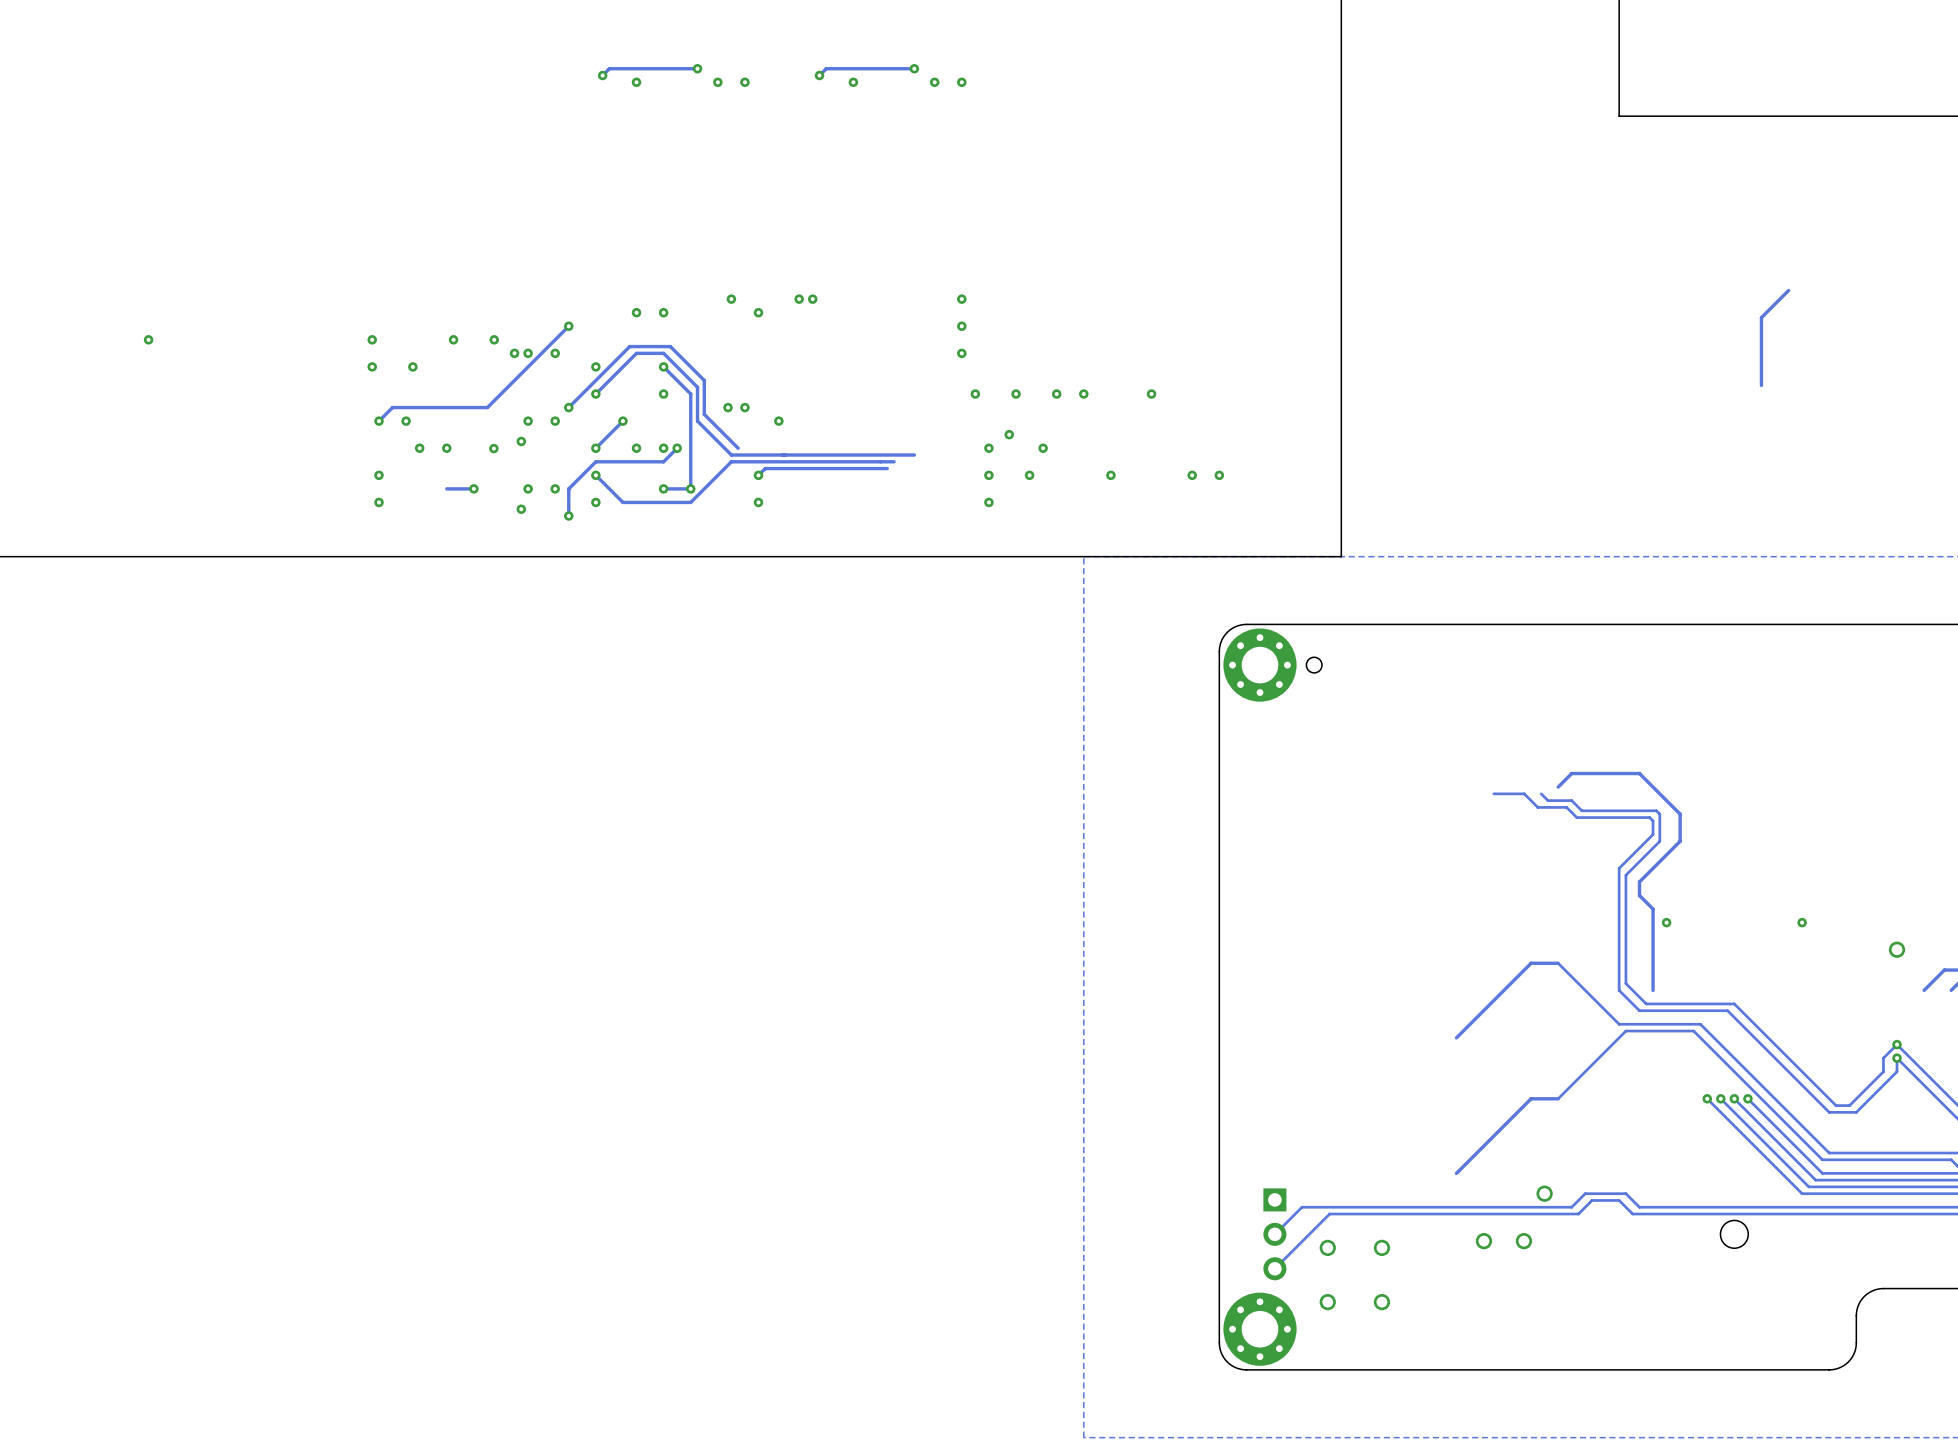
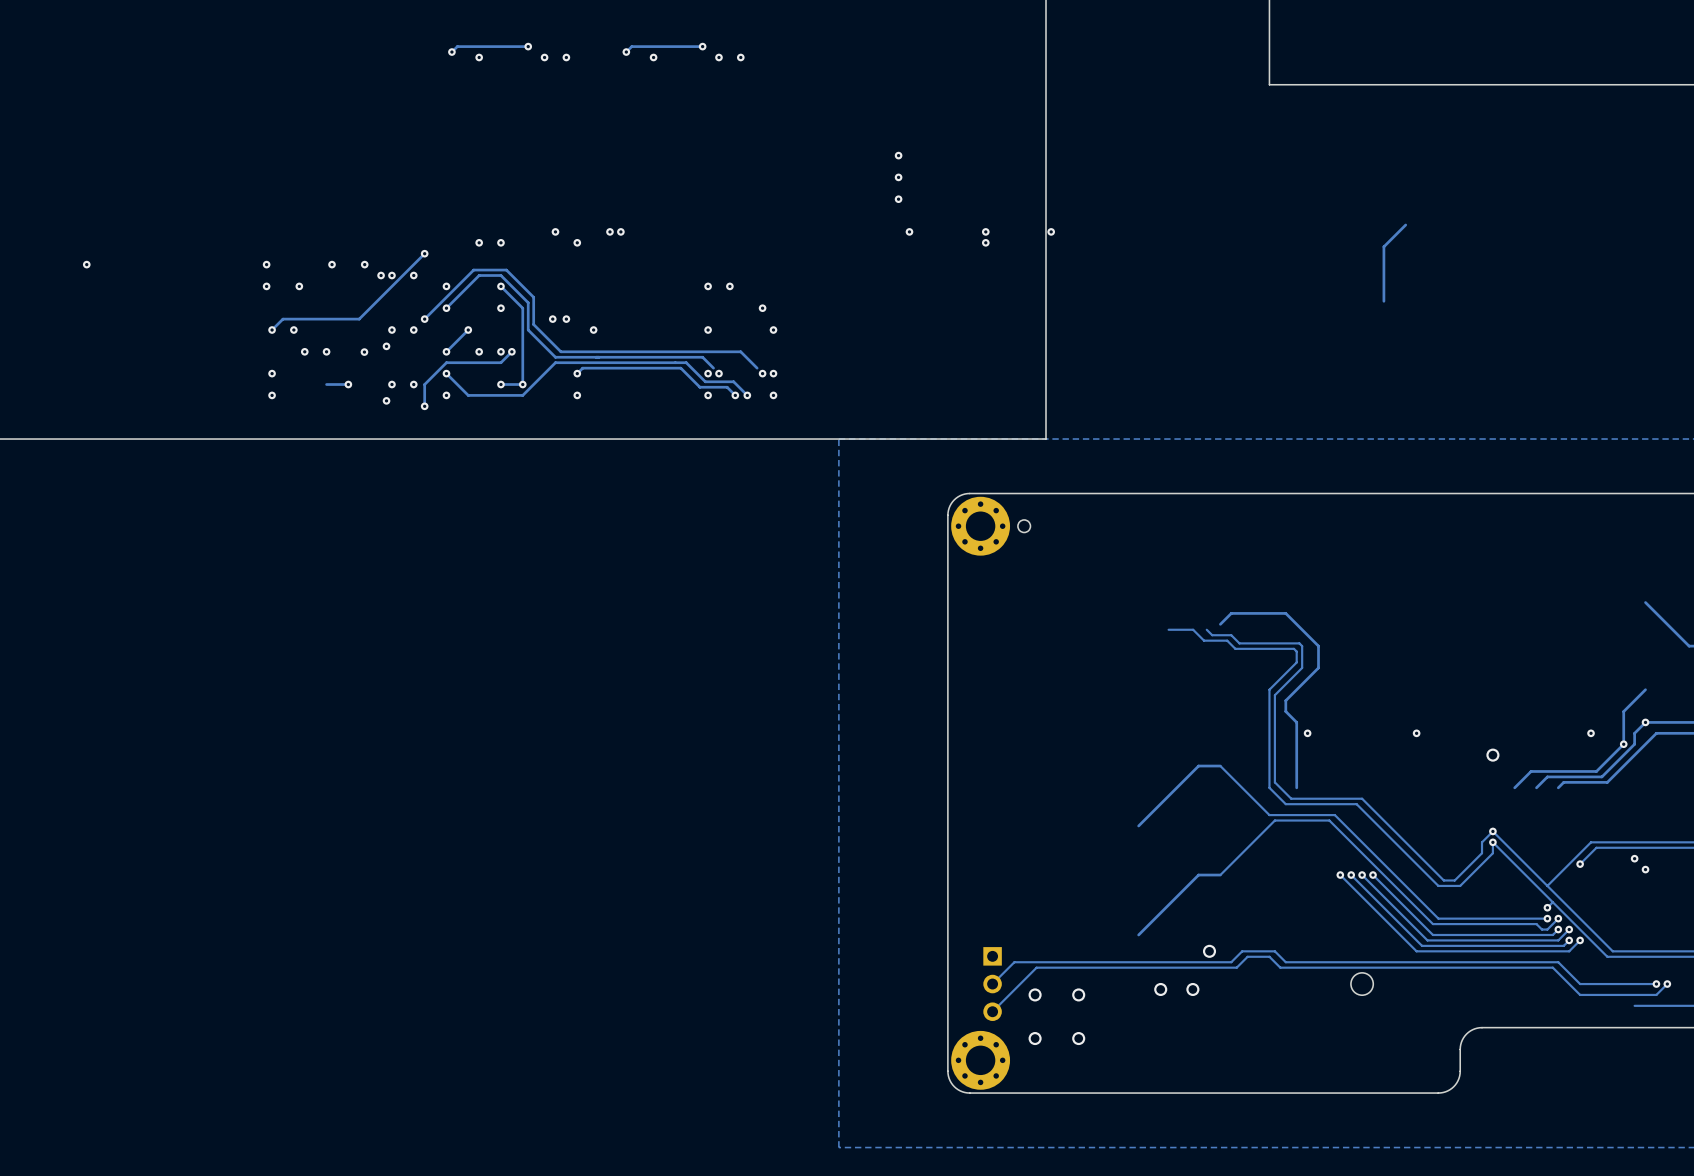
via: none -> (898, 155)
via: none -> (898, 177)
via: none -> (898, 199)
via: (961, 299) -> none
via: none -> (909, 231)
via: none -> (985, 231)
via: none -> (1051, 231)
via: none -> (985, 242)
via: (961, 326) -> none
via: (961, 353) -> none
via: none -> (708, 286)
via: none -> (729, 286)
via: (975, 394) -> none
via: none -> (762, 308)
via: (1016, 394) -> none
via: (1056, 394) -> none
via: (1083, 394) -> none
via: (1151, 394) -> none
via: none -> (708, 330)
via: none -> (773, 330)
via: (1009, 434) -> none
track: none -> (560, 351) (740, 351) (757, 368)
via: (988, 448) -> none
via: (1043, 448) -> none
track: none -> (702, 357) (713, 368)
track: none -> (686, 362) (705, 381) (733, 381) (747, 395)
track: none -> (680, 368) (699, 387) (727, 387) (735, 395)
via: none -> (708, 373)
via: none -> (718, 373)
via: none -> (773, 373)
via: (1029, 475) -> none
via: (1110, 475) -> none
via: (1192, 475) -> none
via: (1219, 475) -> none
via: none -> (708, 395)
via: none -> (735, 395)
via: none -> (747, 395)
via: (988, 502) -> none
via: none -> (773, 395)

